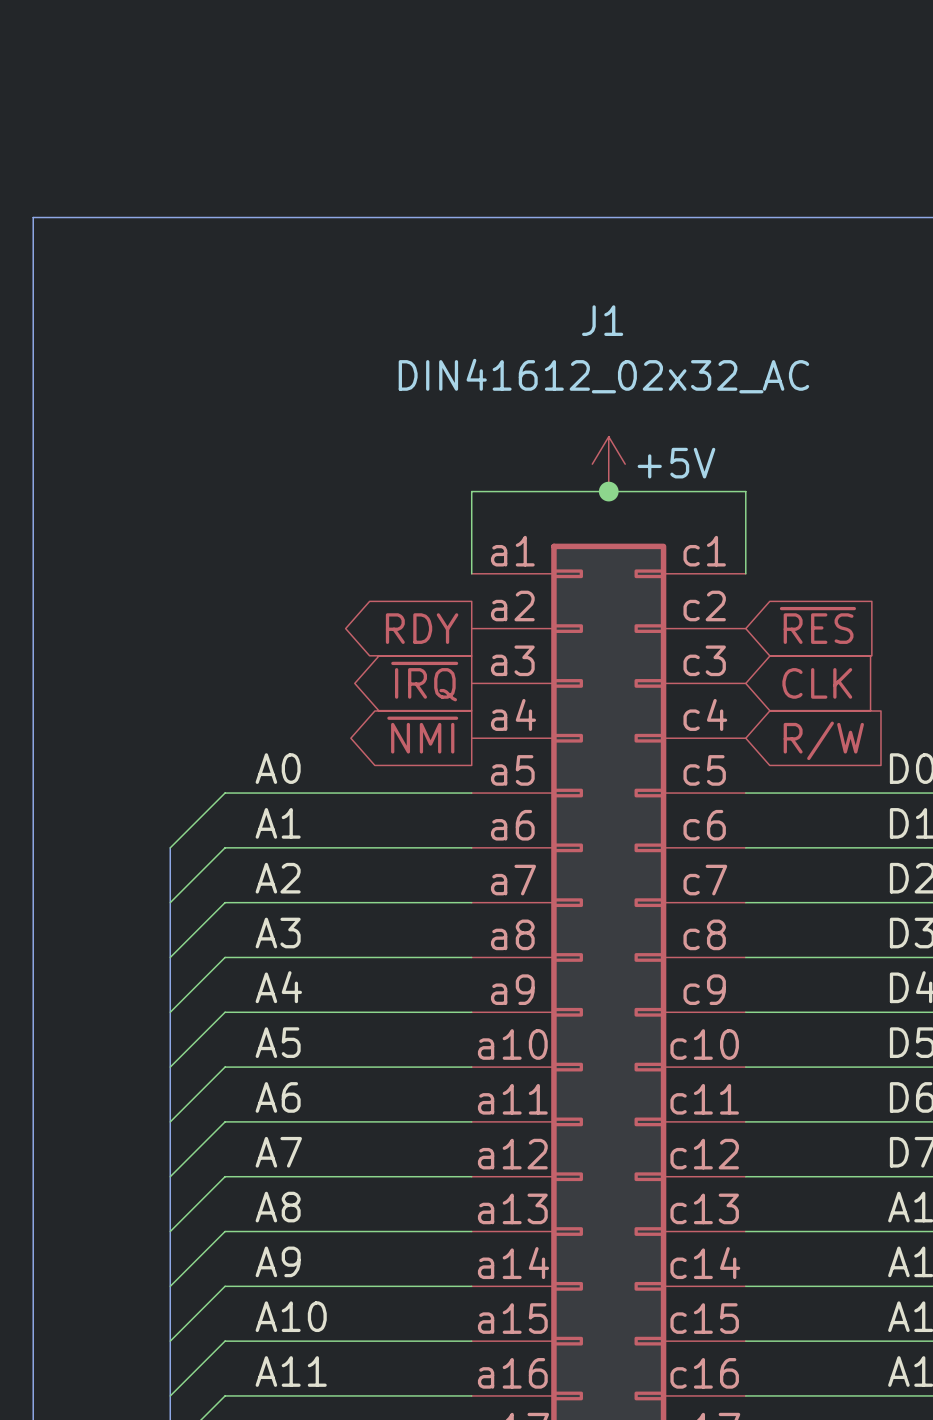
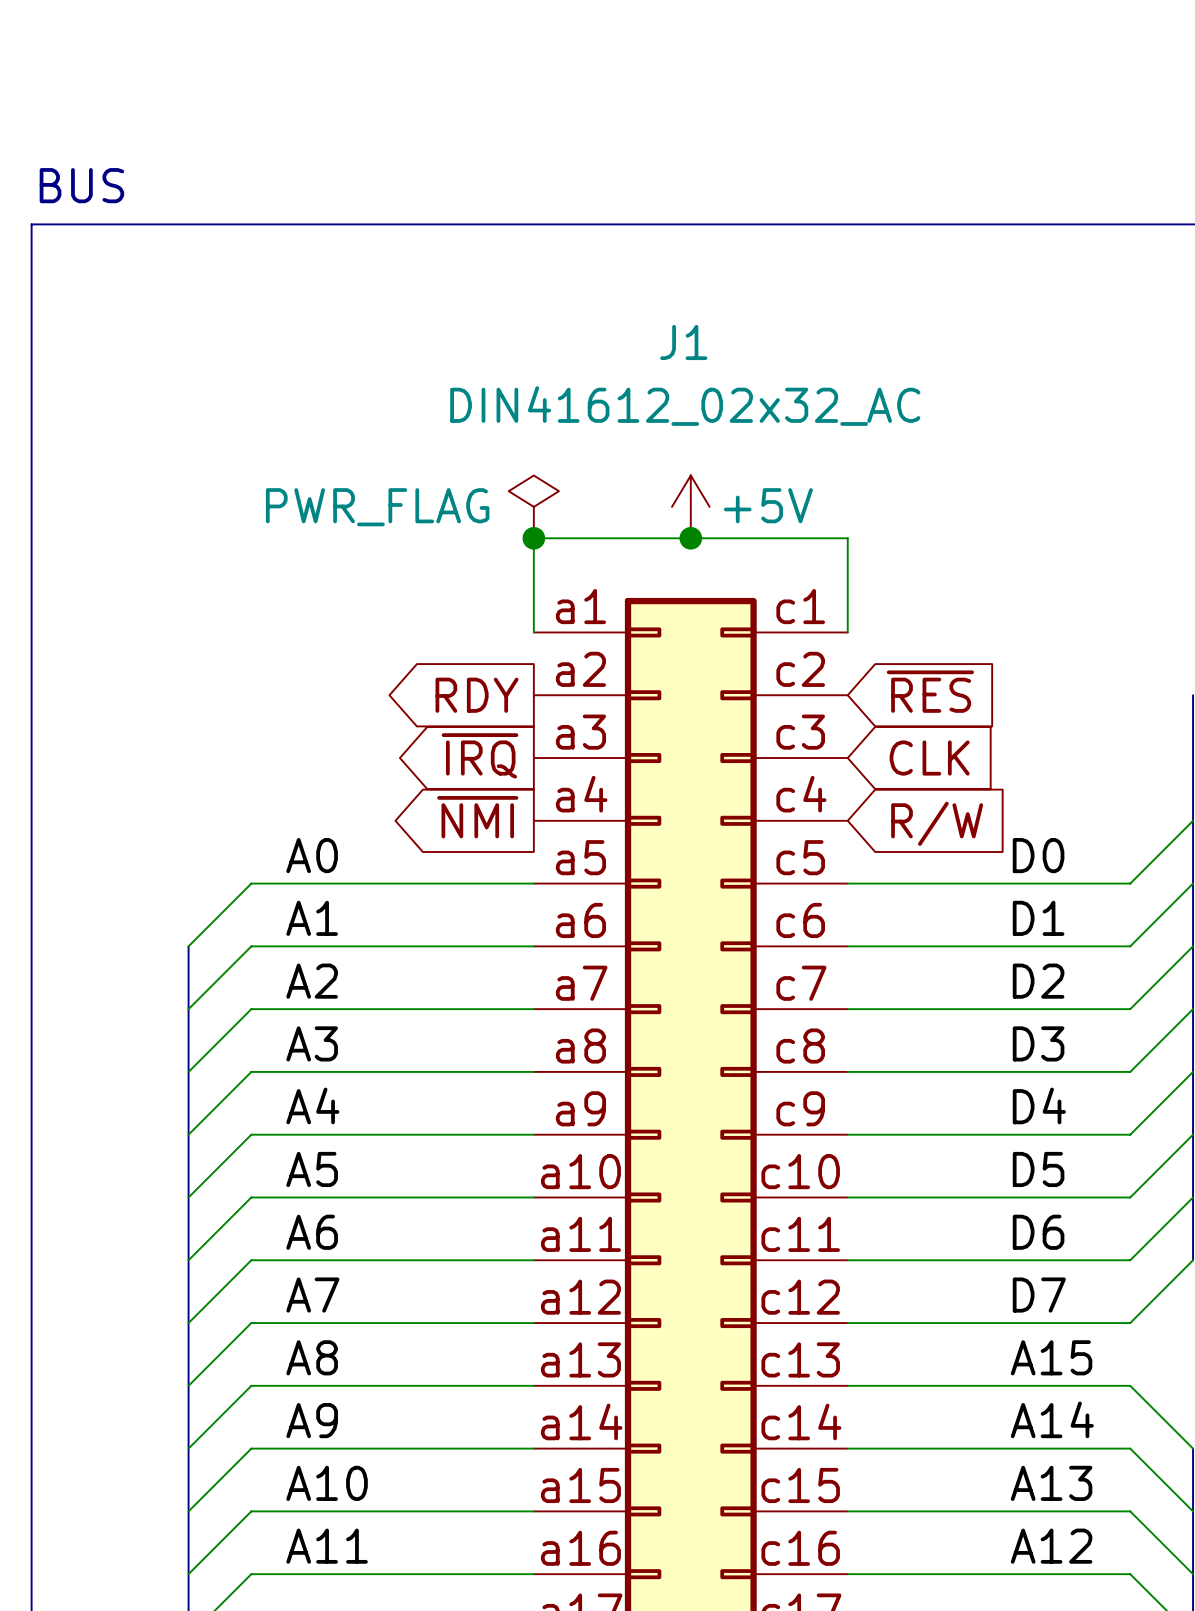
text: none -> BUS (81, 185)
power symbol: none -> PWR_FLAG (533, 506)
junction: none -> (533, 538)

